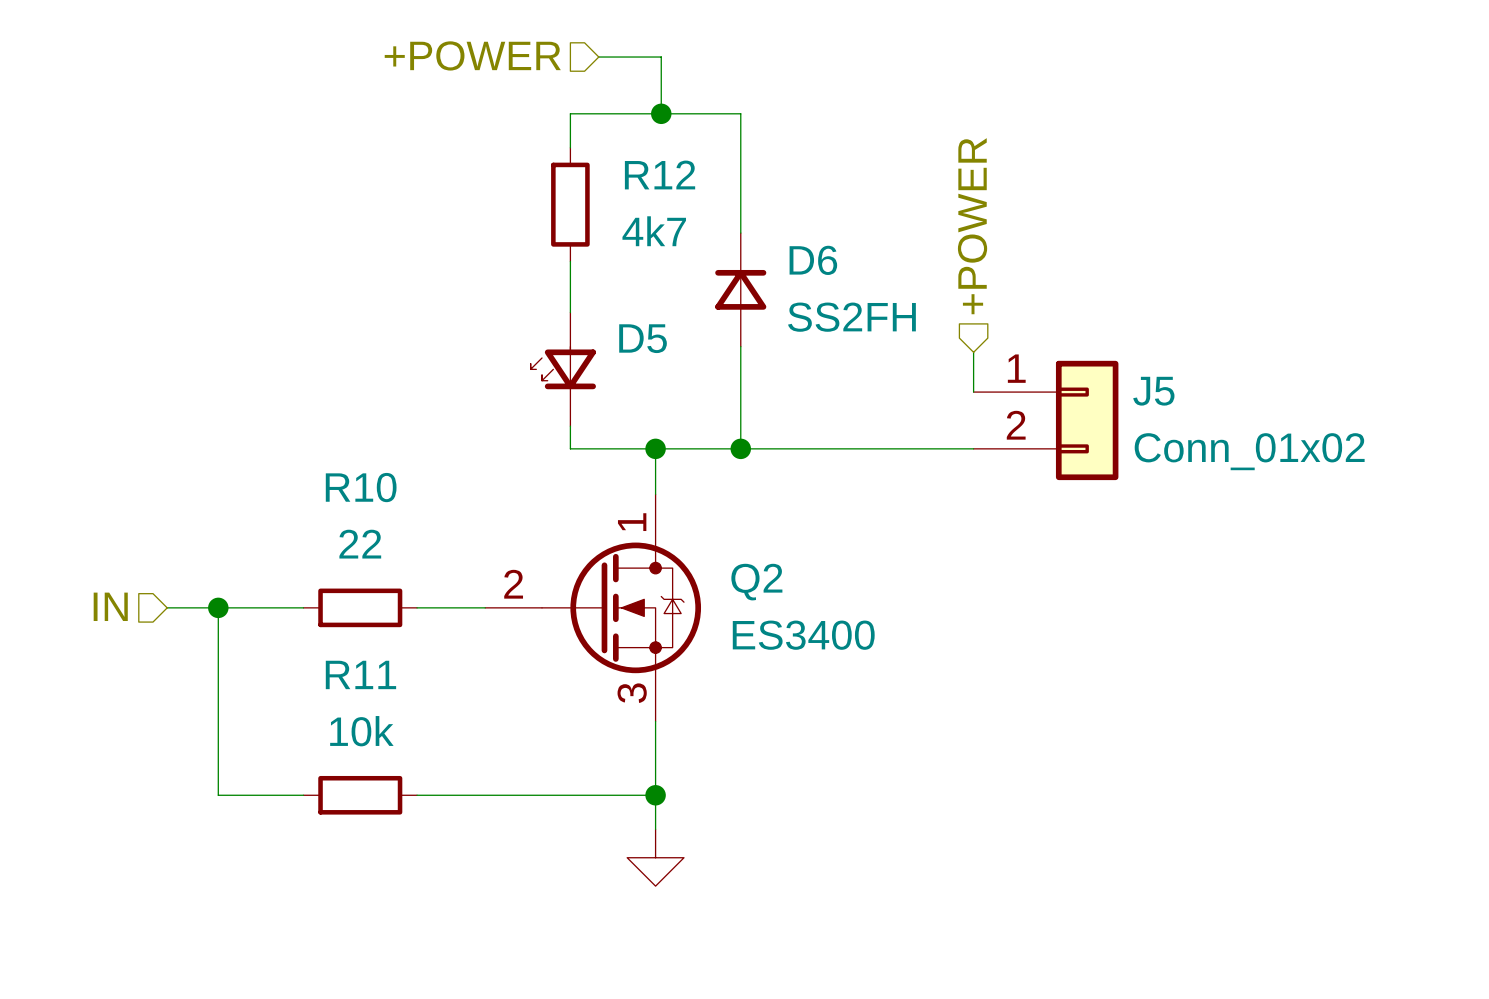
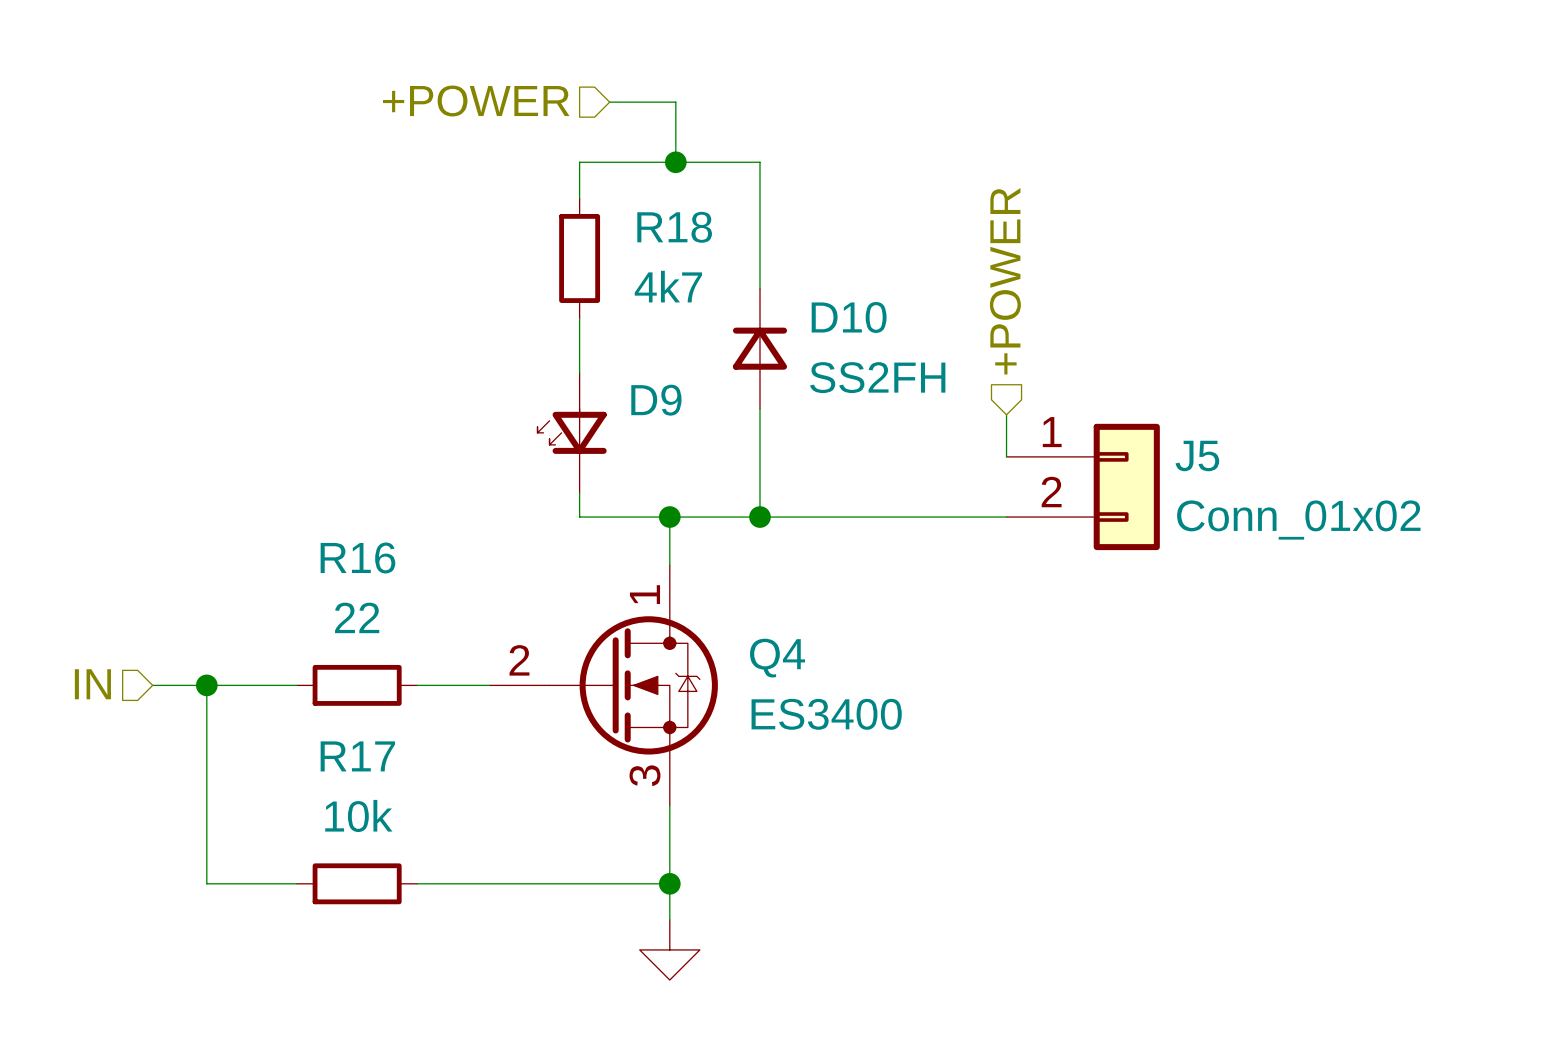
R12 name: R12 (660, 174) -> R18 (674, 227)
D6 name: D6 (813, 260) -> D10 (849, 317)
D5 name: D5 (643, 338) -> D9 (656, 400)
R10 name: R10 (361, 487) -> R16 (357, 557)
Q2 name: Q2 (756, 582) -> Q4 (777, 658)
R11 name: R11 (360, 674) -> R17 (357, 756)

